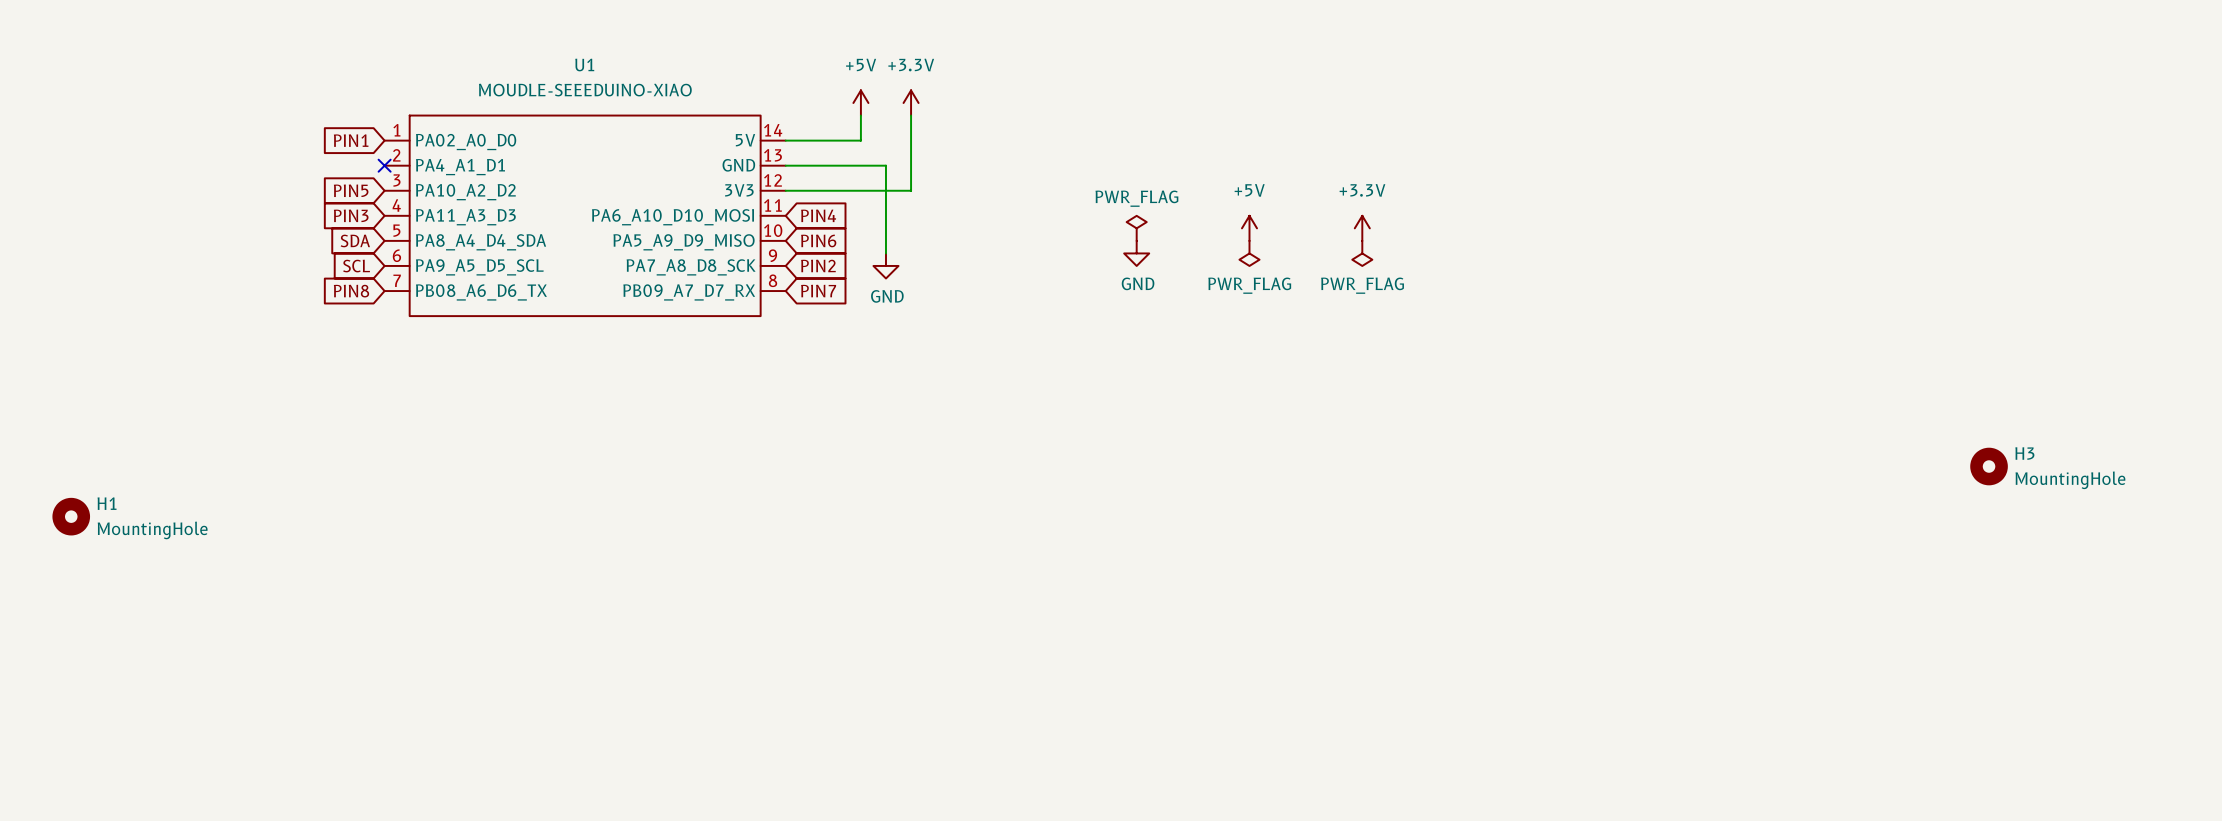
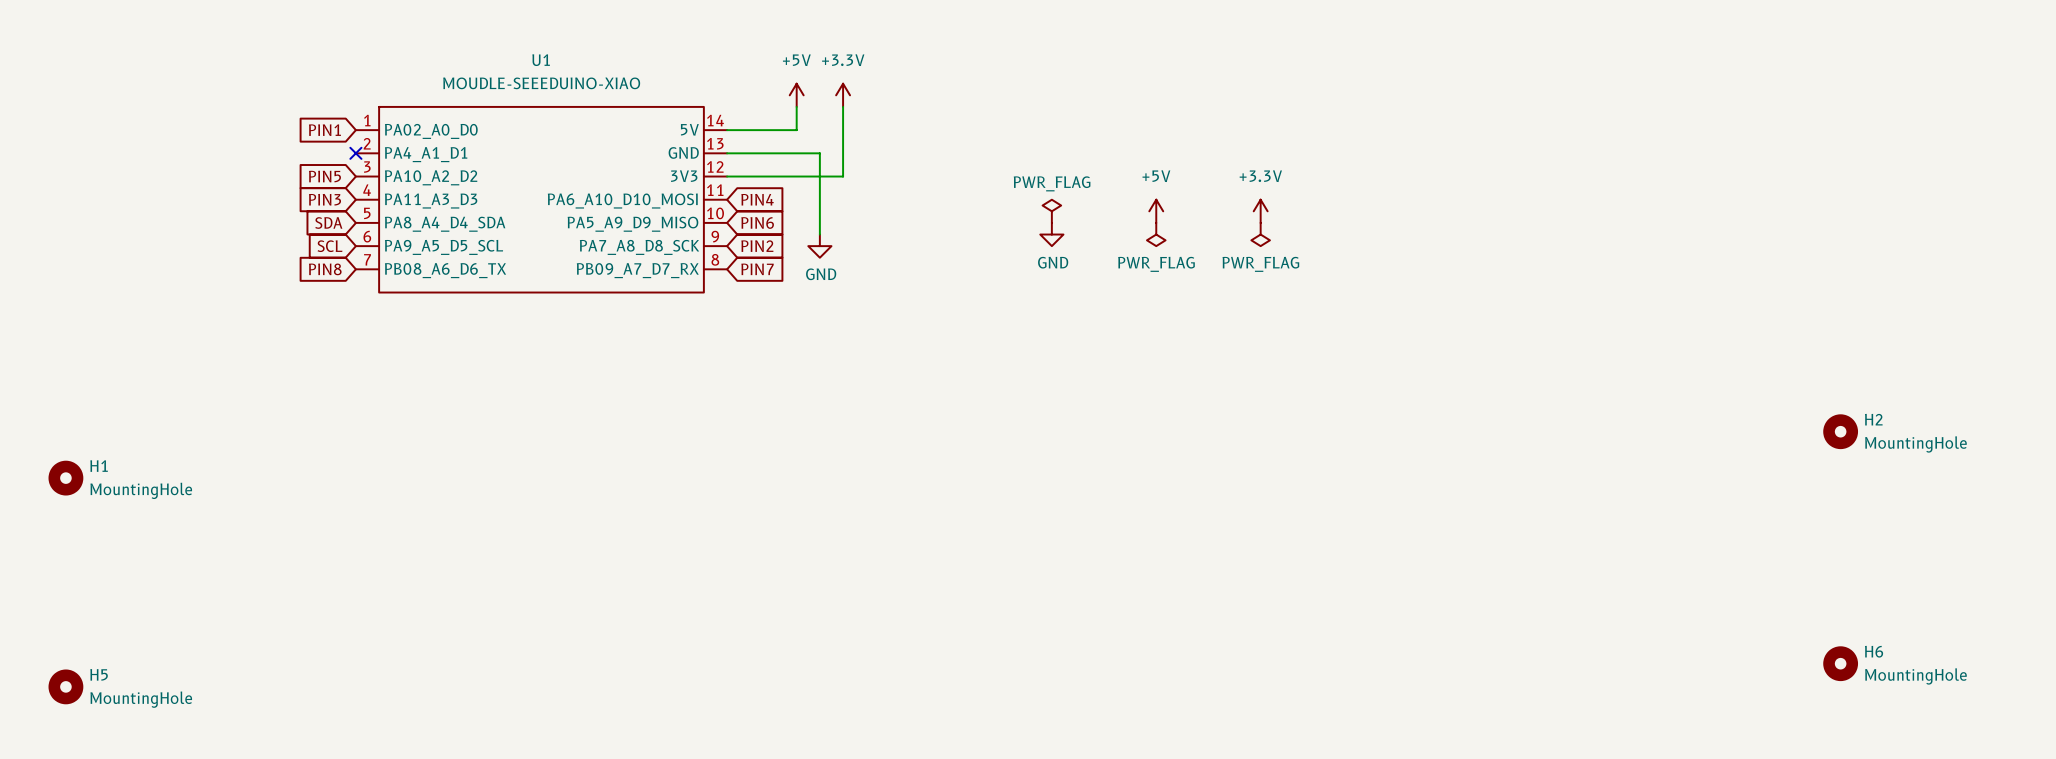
H3 name: H3 (2024, 453) -> H2 (1873, 419)
H6: none -> MountingHole (1840, 663)
H5: none -> MountingHole (65, 686)

